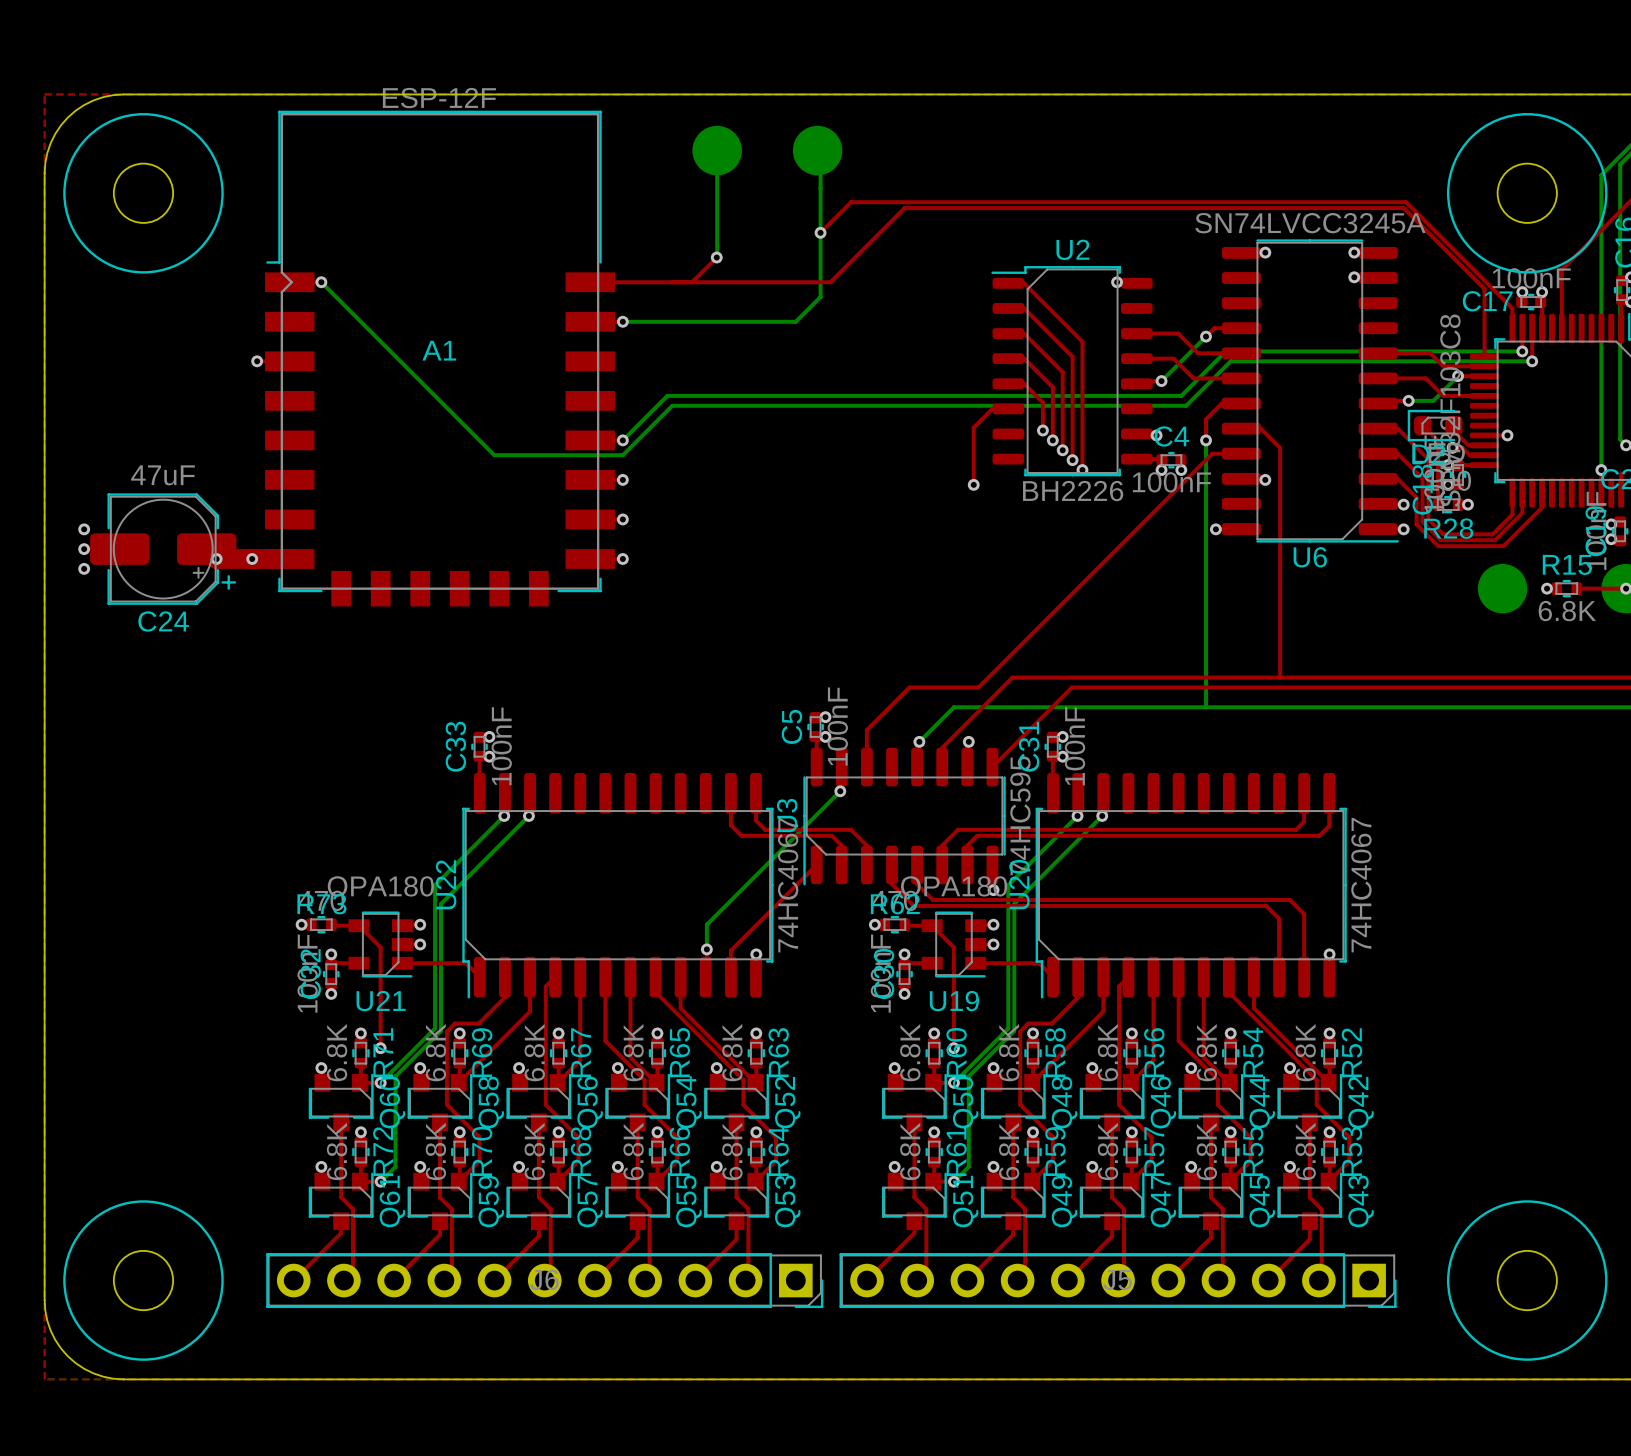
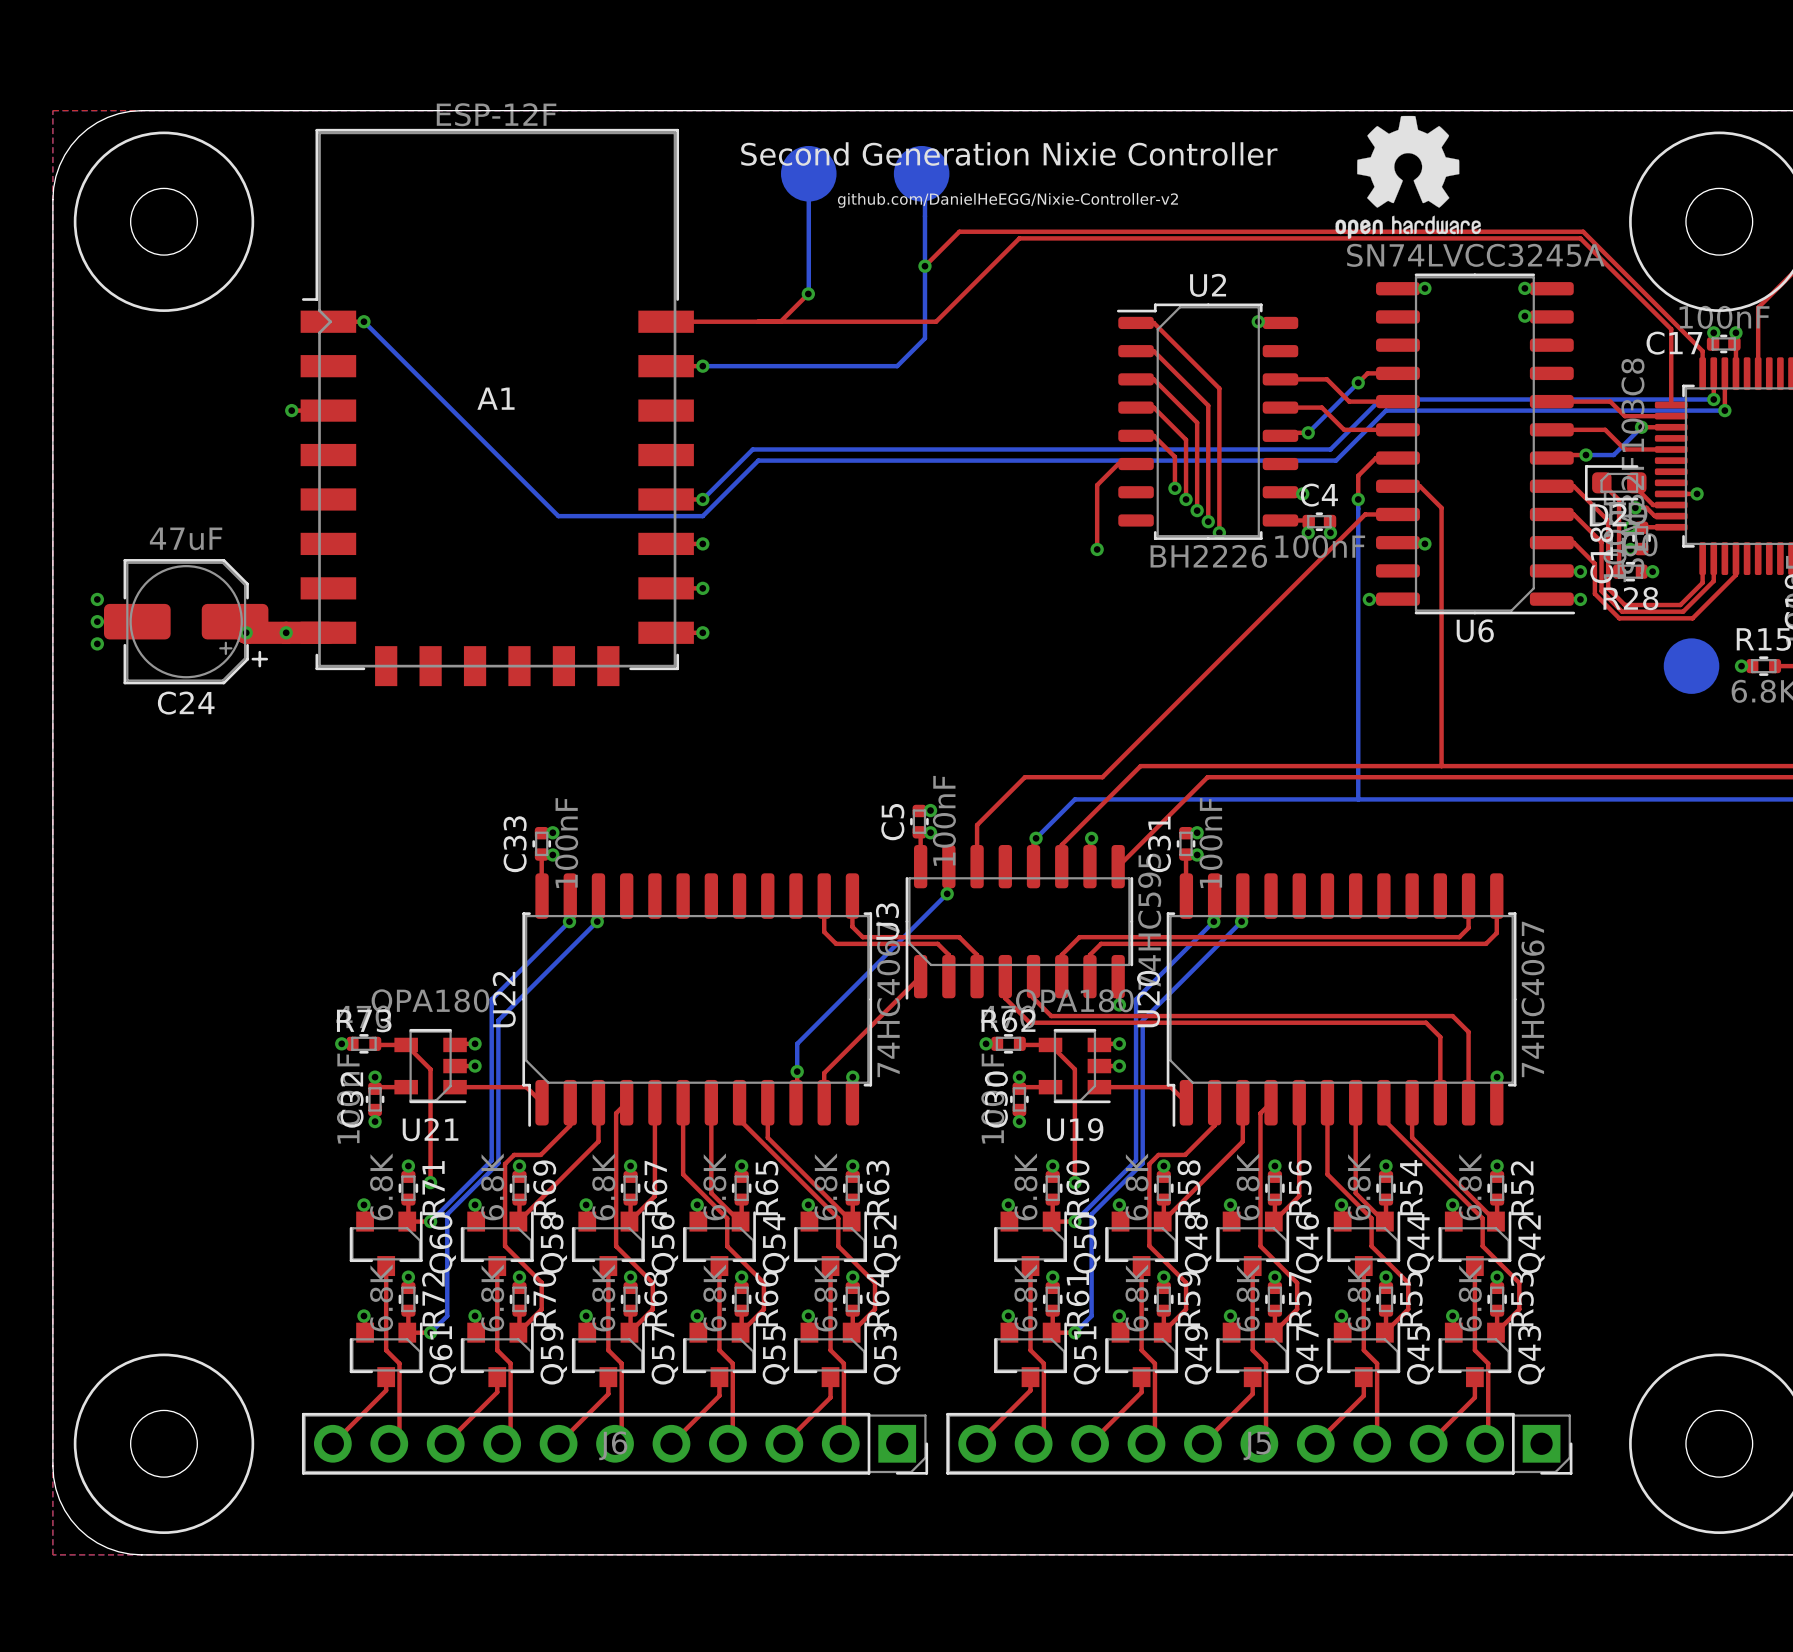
drawing: none -> [1335, 115, 1481, 239]
text: none -> Second Generation Nixie Controller (1009, 154)
text: none -> github.com/DanielHeEGG/Nixie-Controller-v2 (1007, 200)

